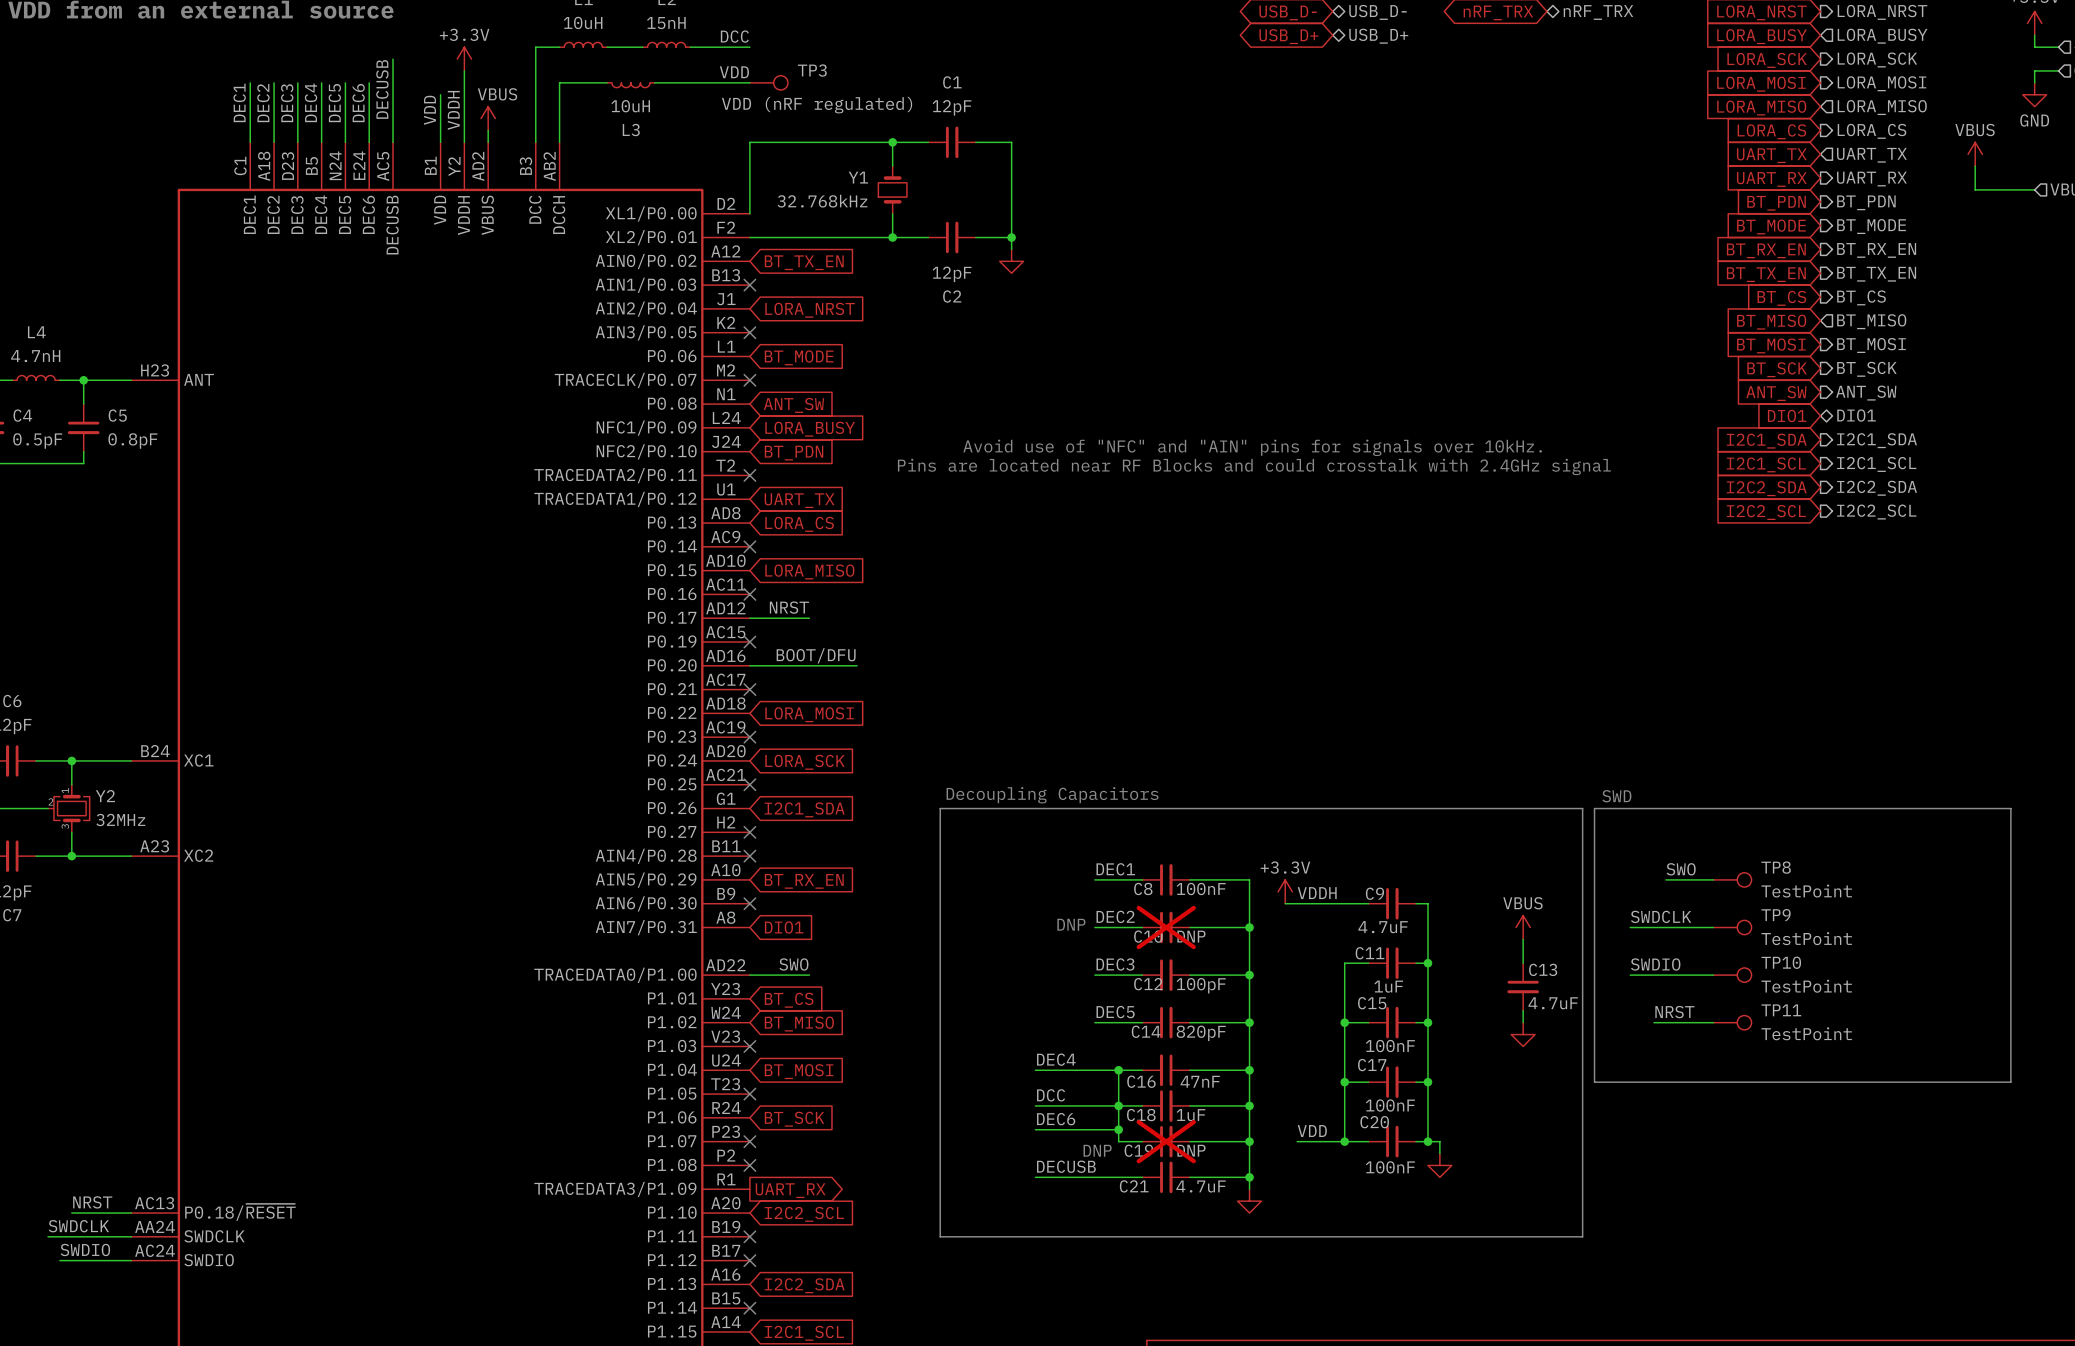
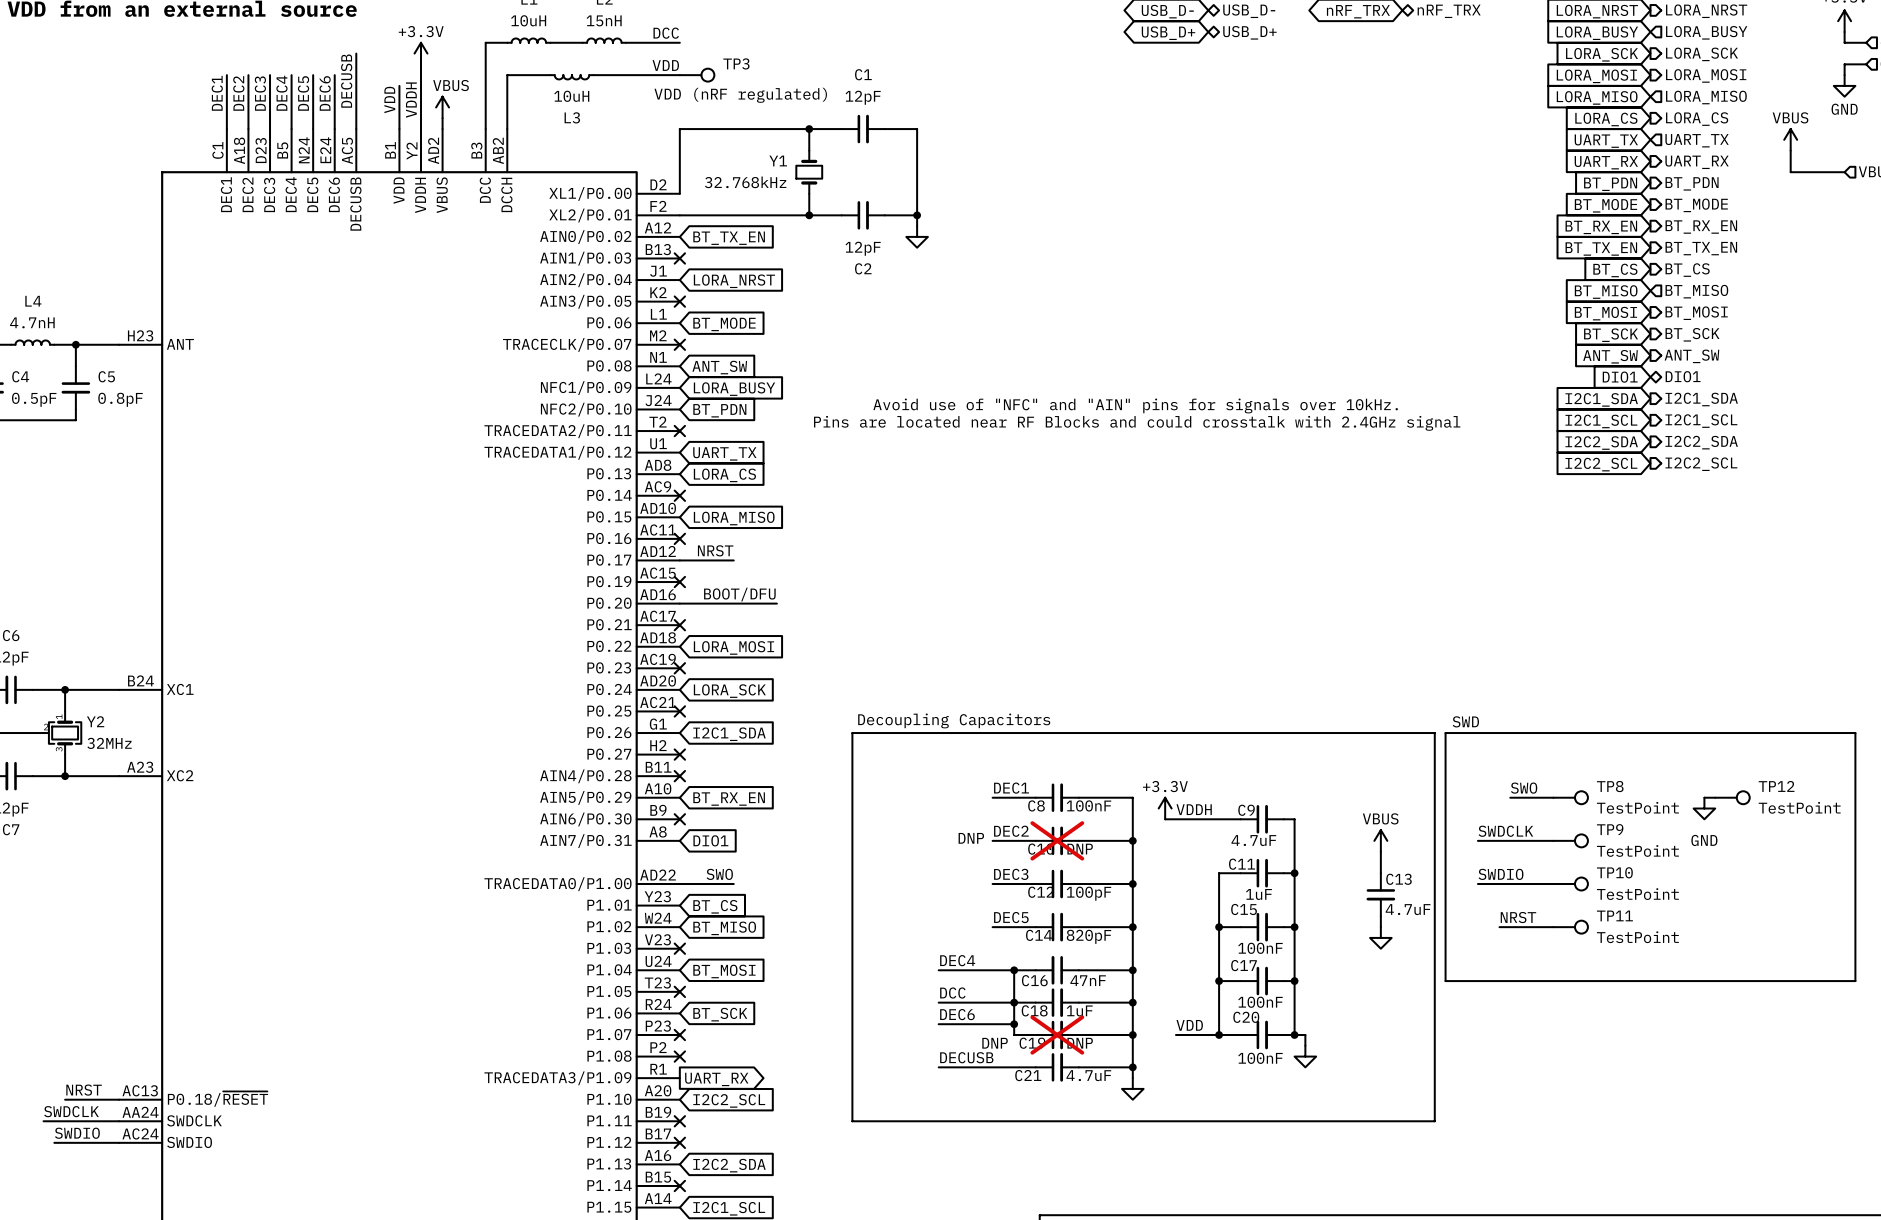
line: (2010, 808) (2010, 1082) -> (1823, 733) (1855, 733) (1855, 981) (1823, 981)
wire: none -> (1704, 797) (1715, 797)
TP12: none -> TestPoint (1732, 797)
power symbol: none -> GND (1704, 808)

